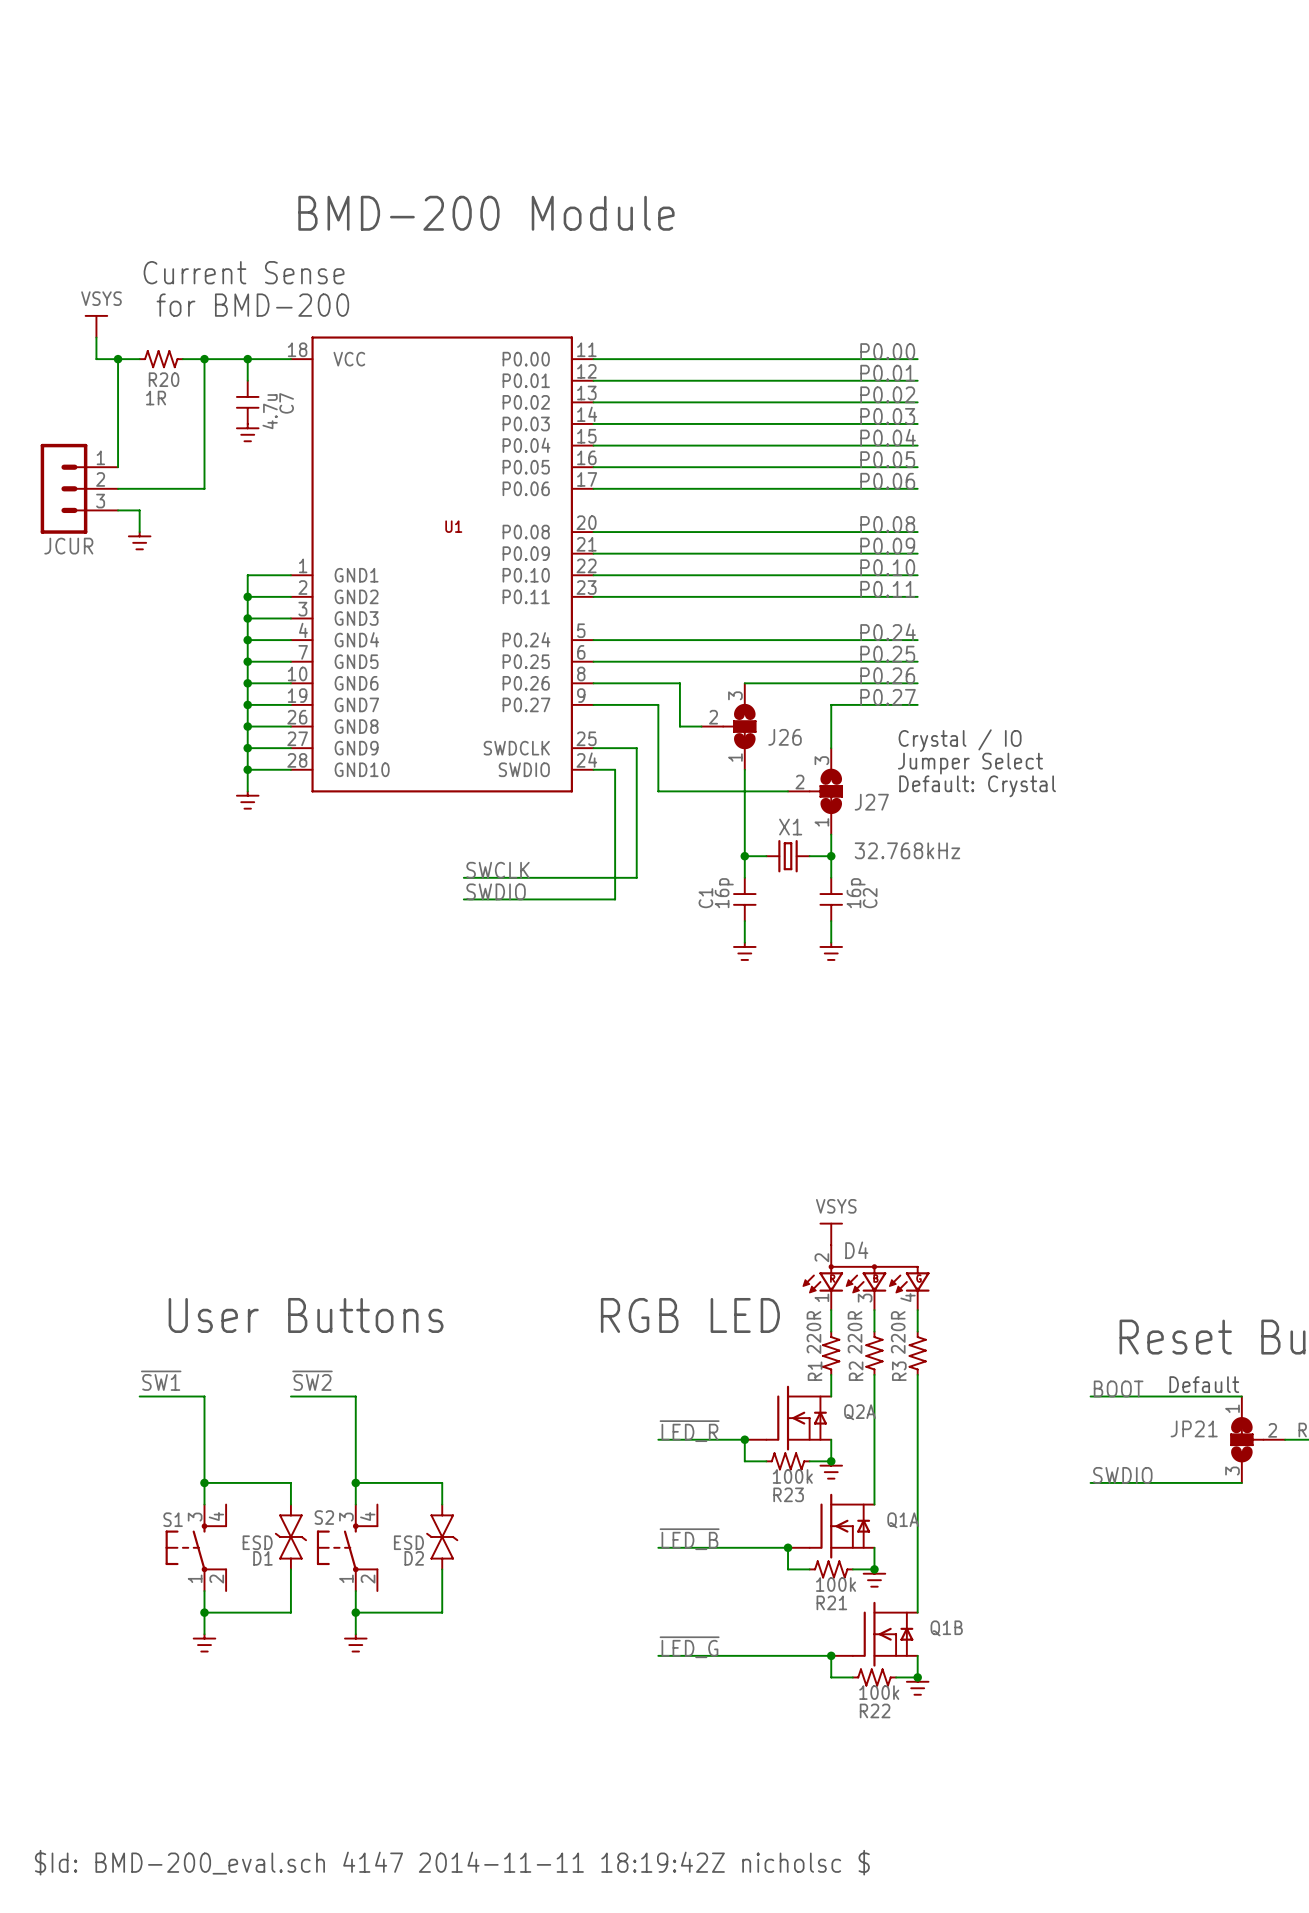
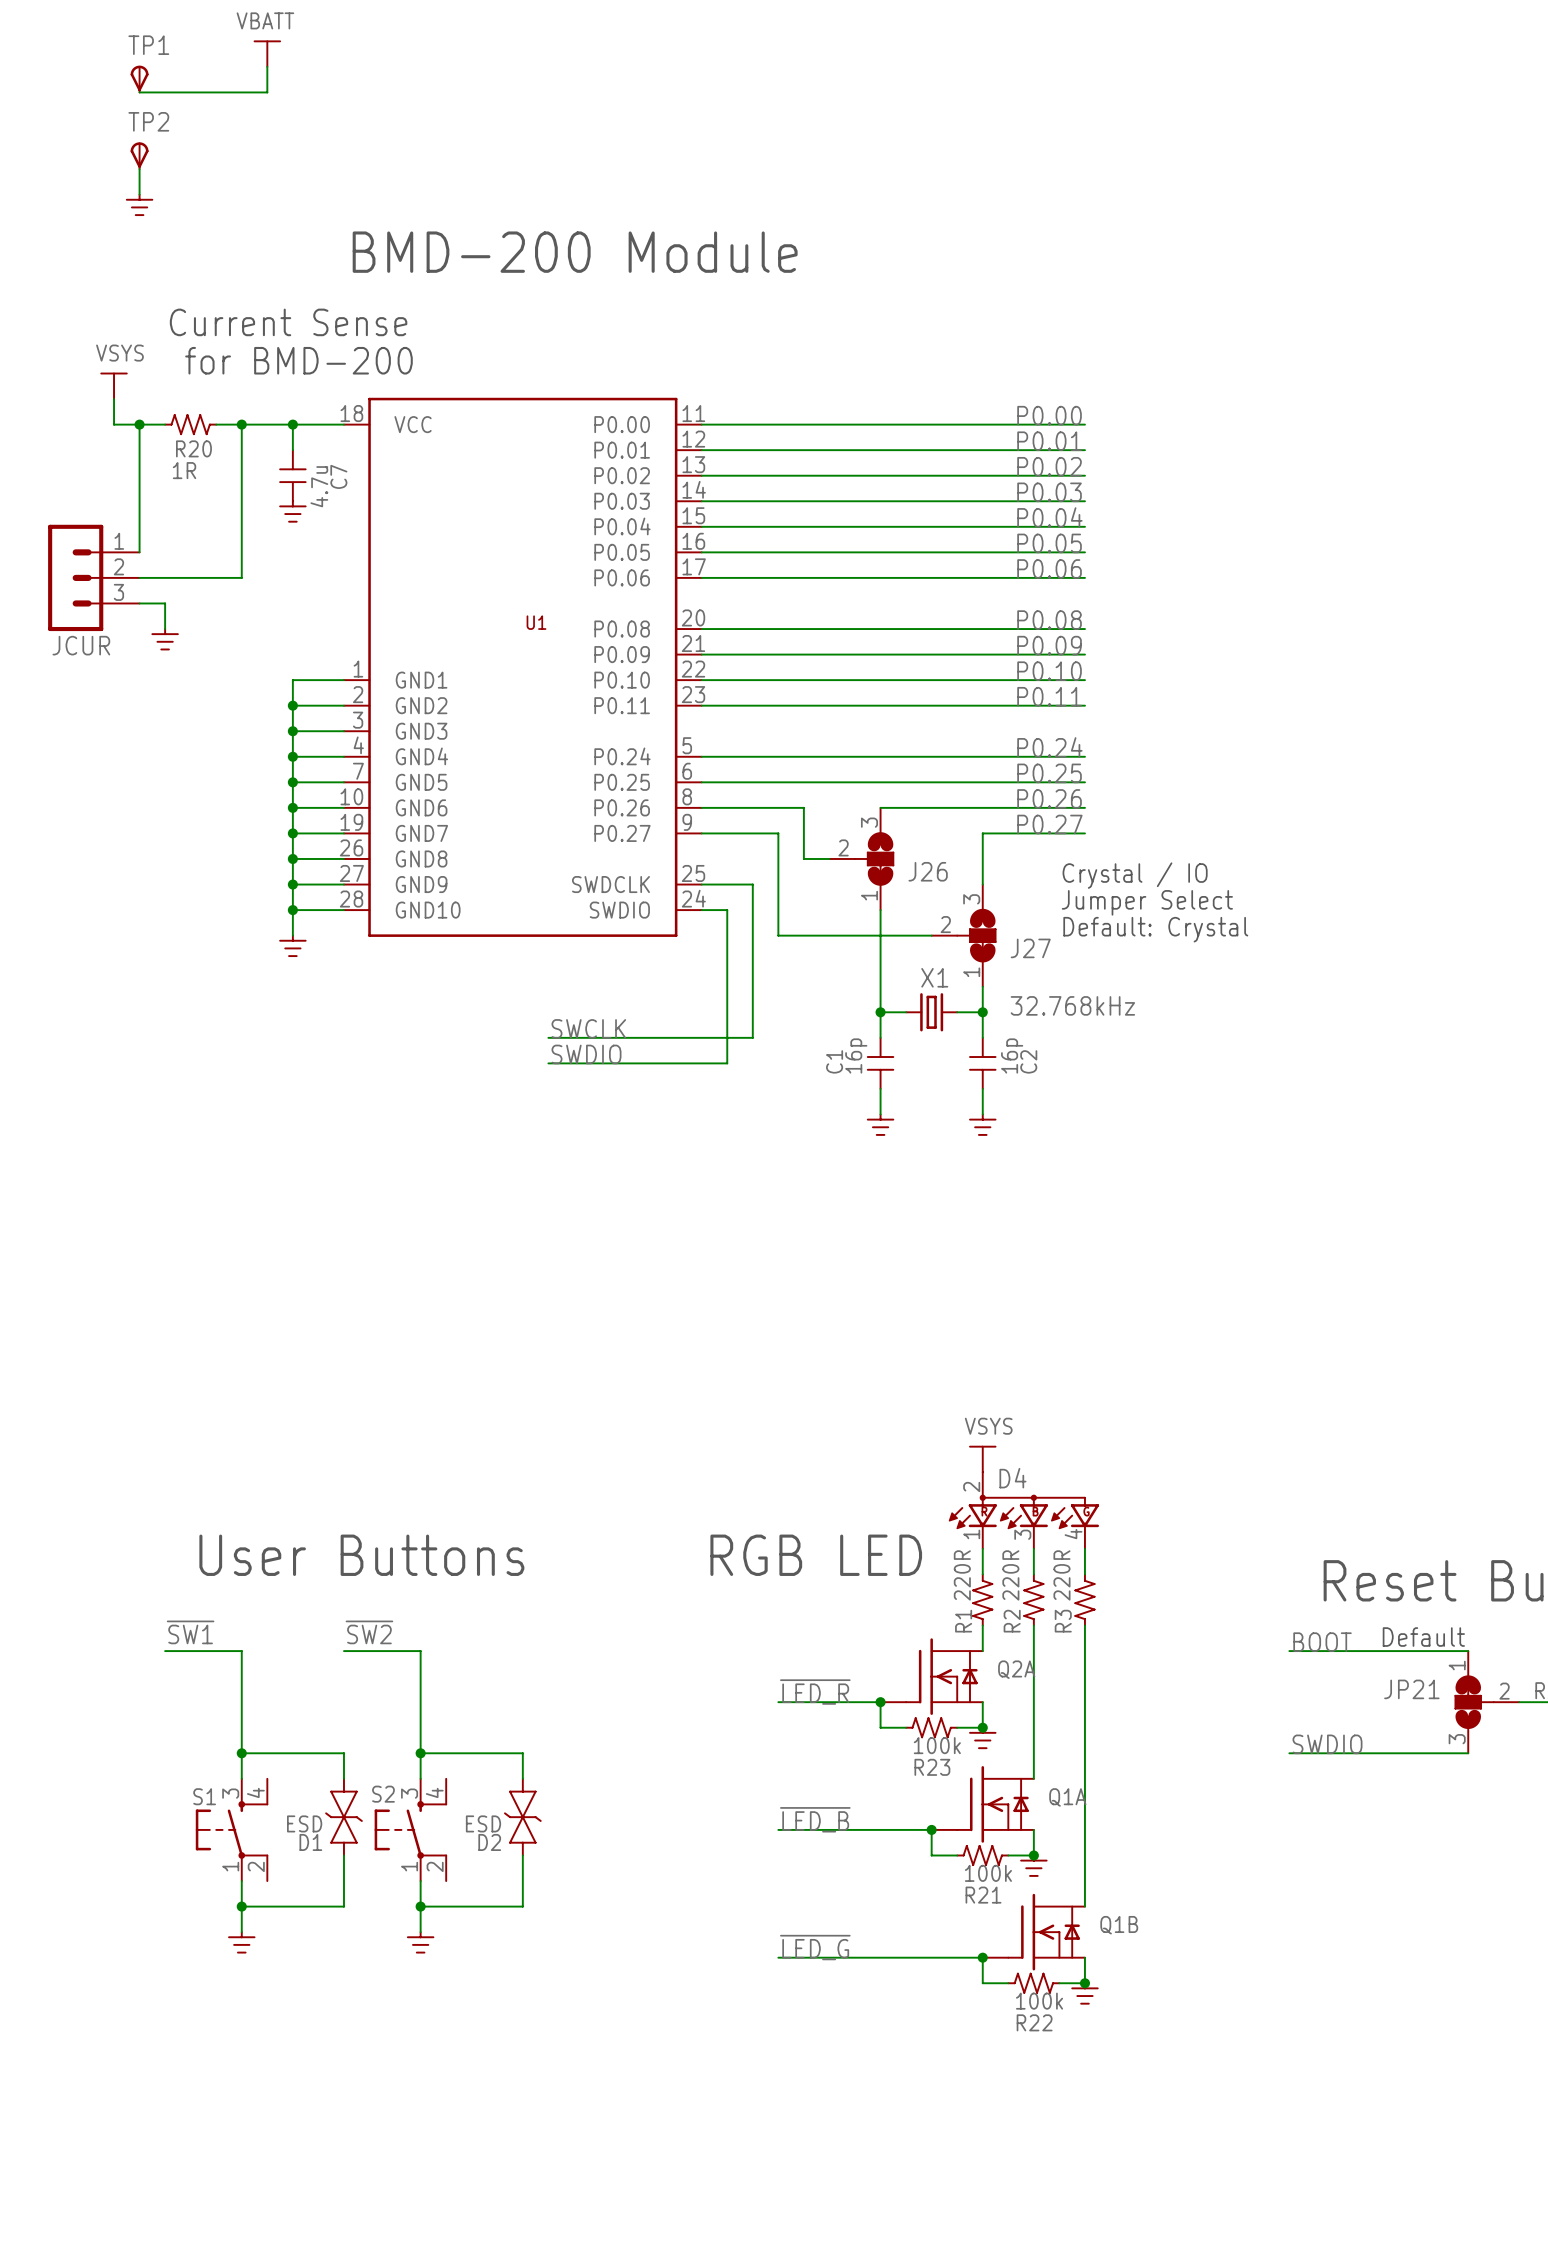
power symbol: none -> VBATT (267, 53)
wire: none -> (267, 66) (267, 92) (139, 92)
TP1: none -> (139, 79)
TP2: none -> (139, 155)
wire: none -> (139, 169) (139, 194)
power symbol: none -> (139, 204)
text: $Id: BMD-200_eval.sch 4147 2014-11-11 18:19:42Z nicholsc $ (452, 1862) -> none

